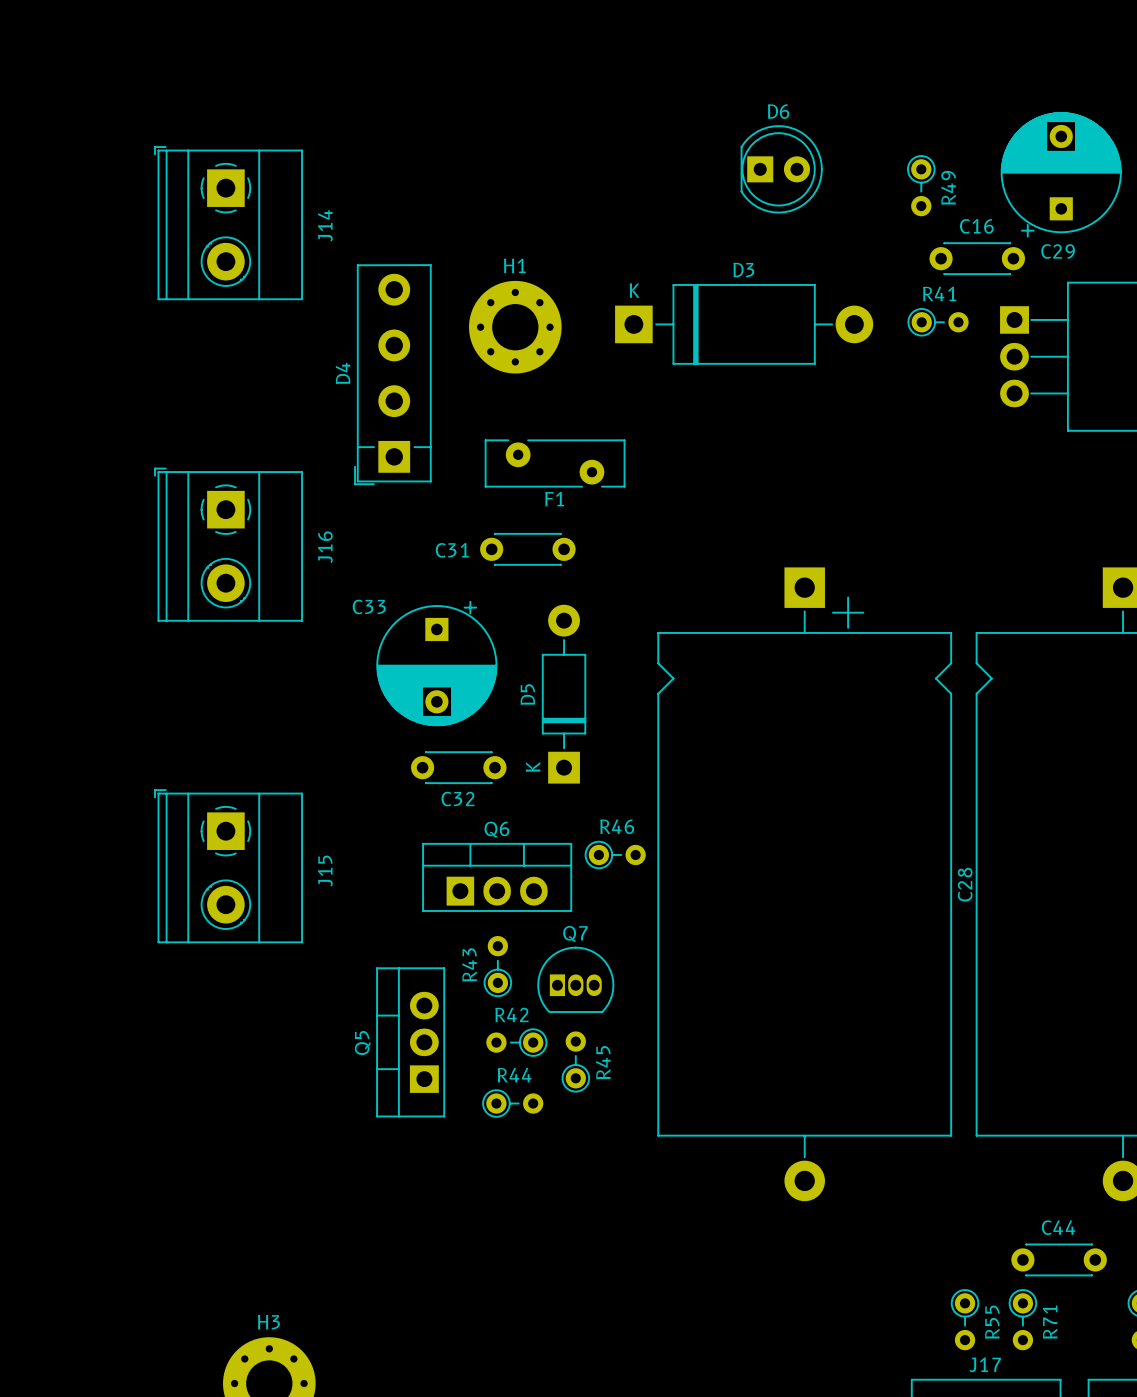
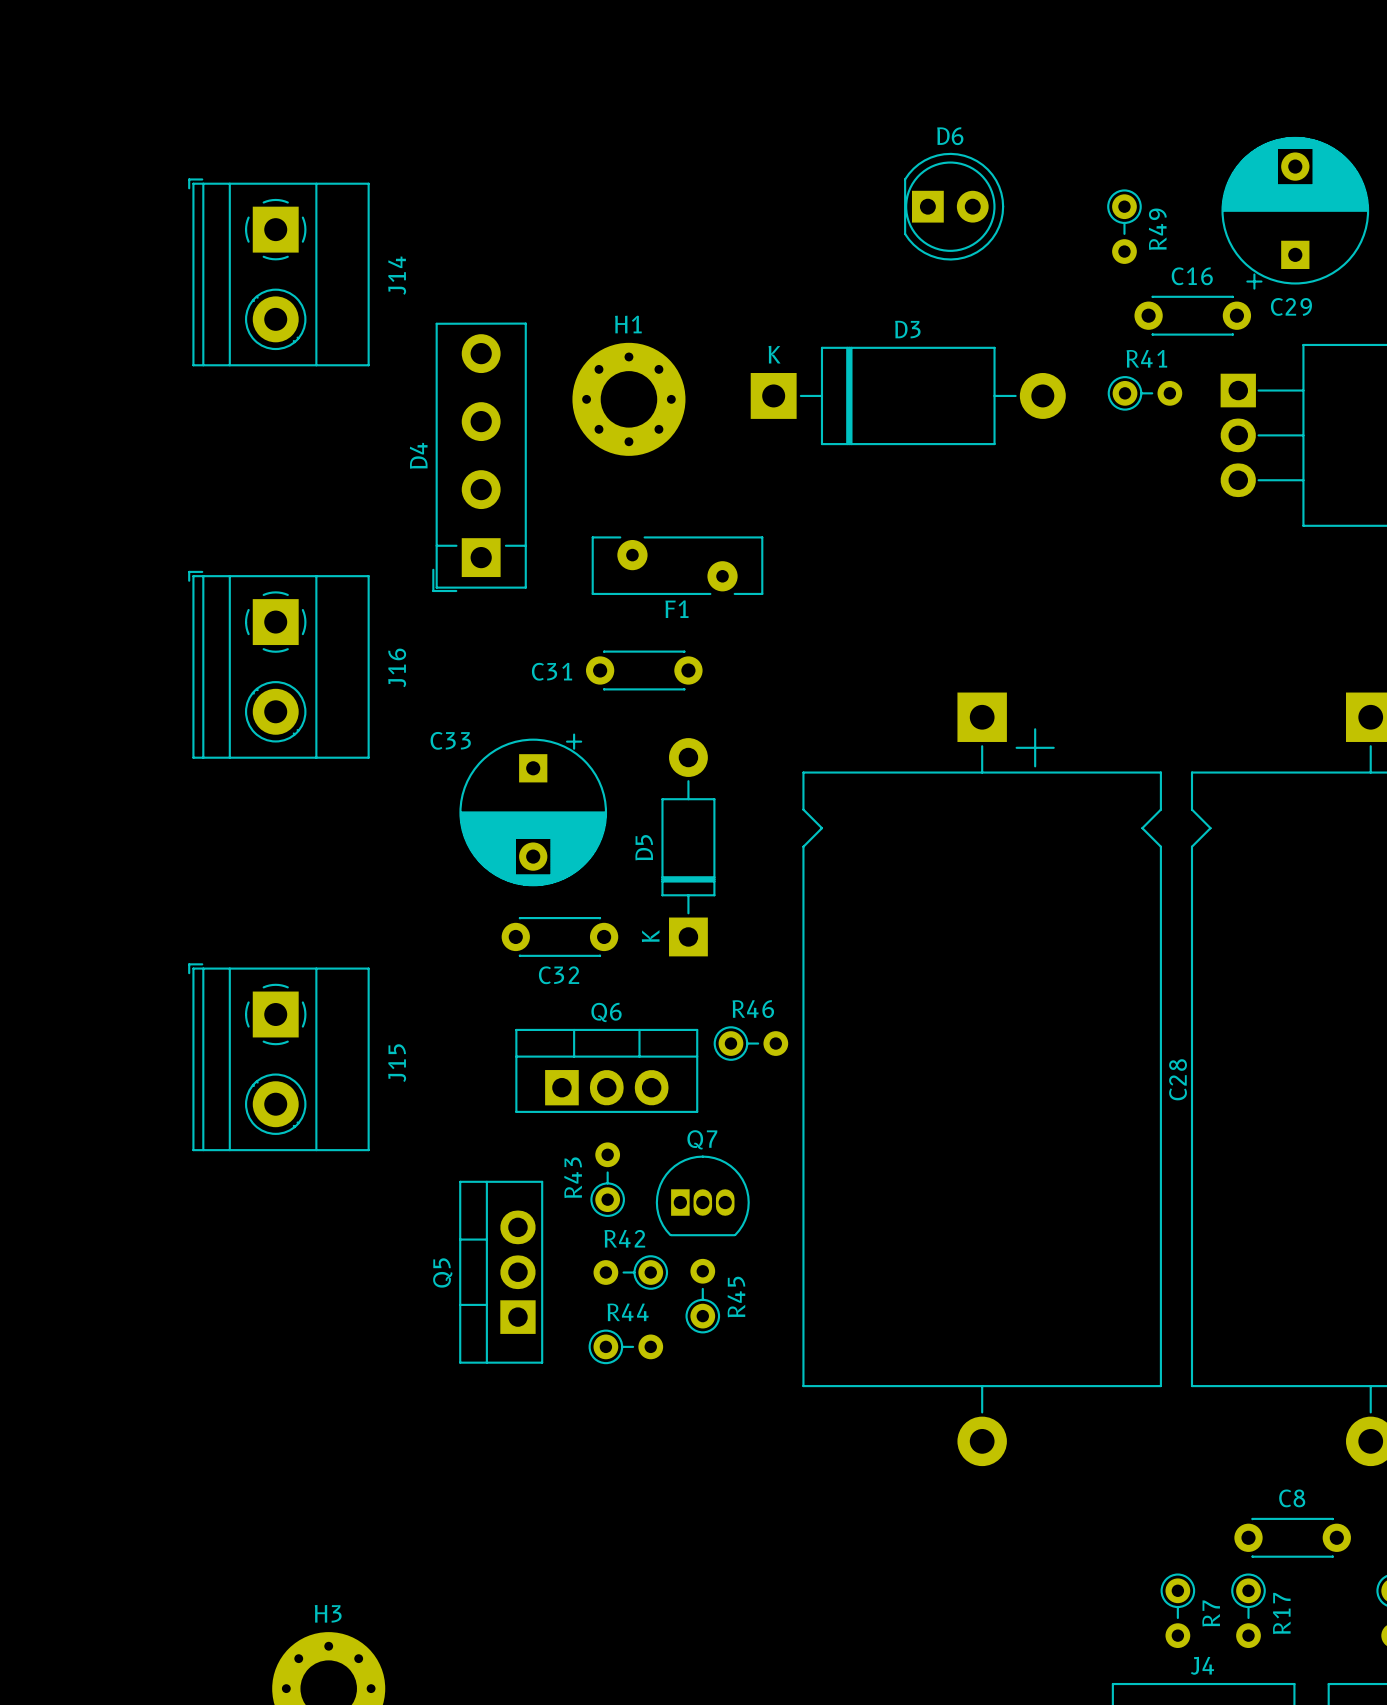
C44 name: C44 (1058, 1227) -> C8 (1292, 1498)
R55 name: R55 (992, 1322) -> R7 (1211, 1613)
R71 name: R71 (1050, 1322) -> R17 (1281, 1613)
J17 name: J17 (985, 1364) -> J4 (1202, 1665)

